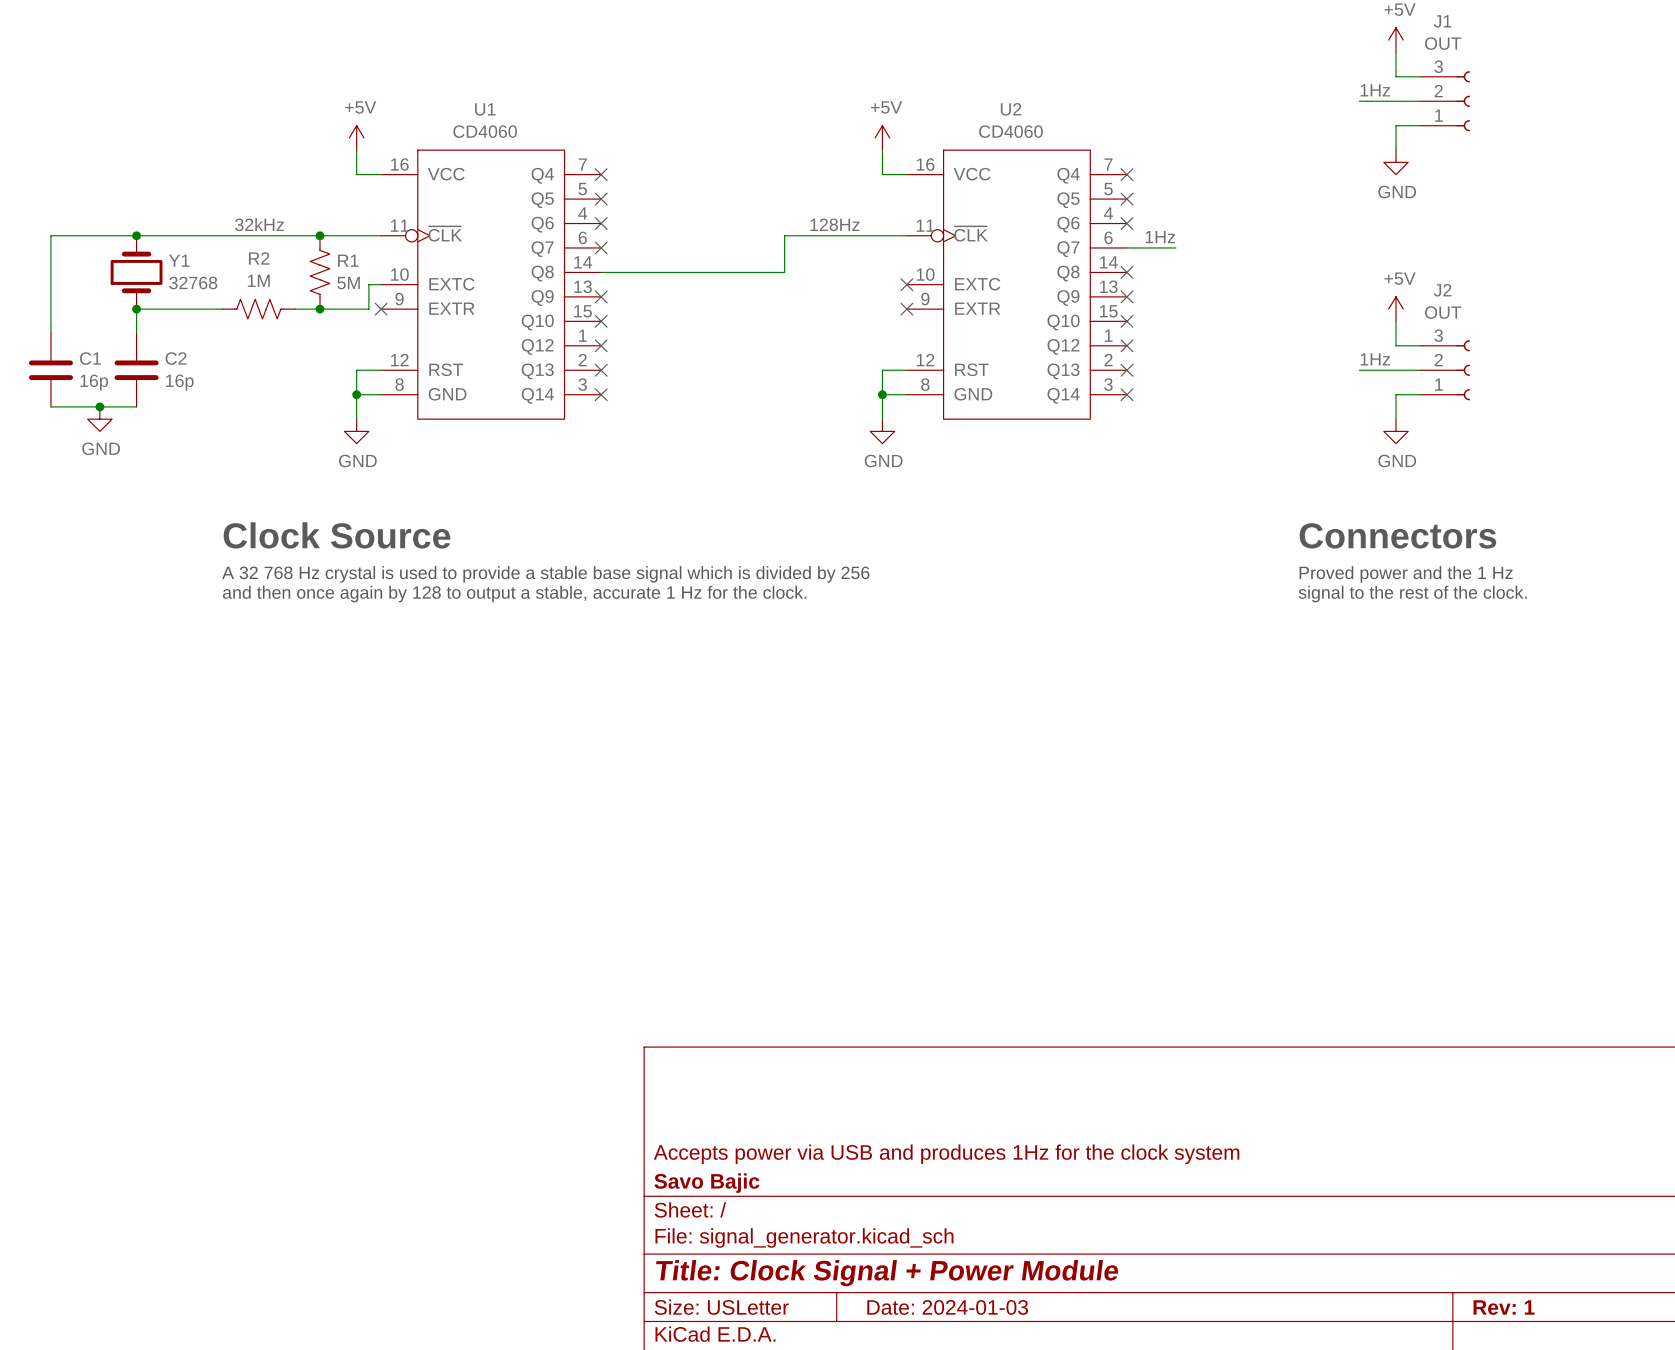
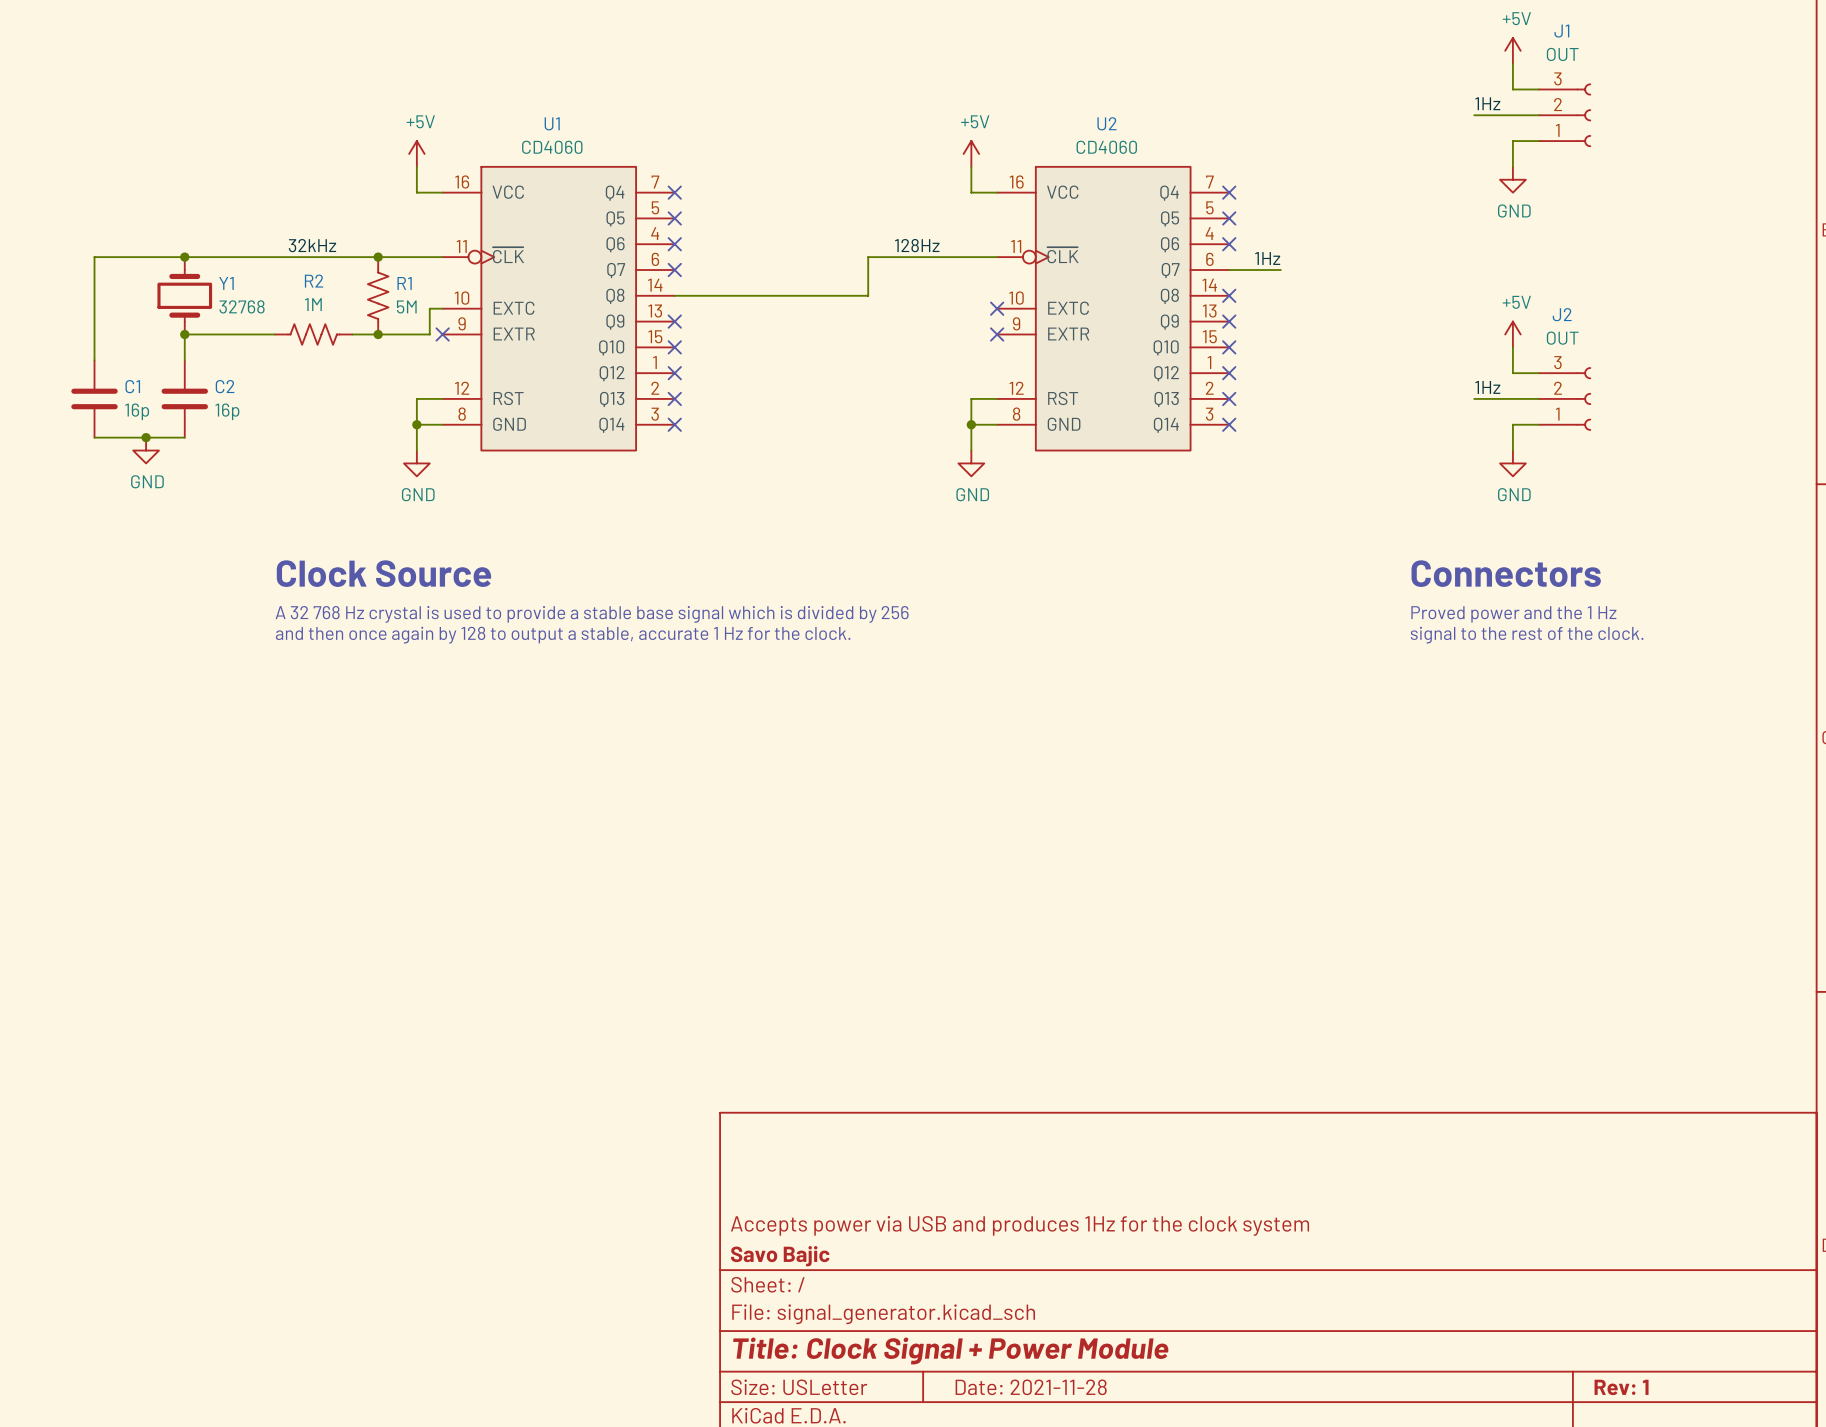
title block: Date: 2024-01-03 (947, 1307) -> Date: 2021-11-28 (1031, 1387)

